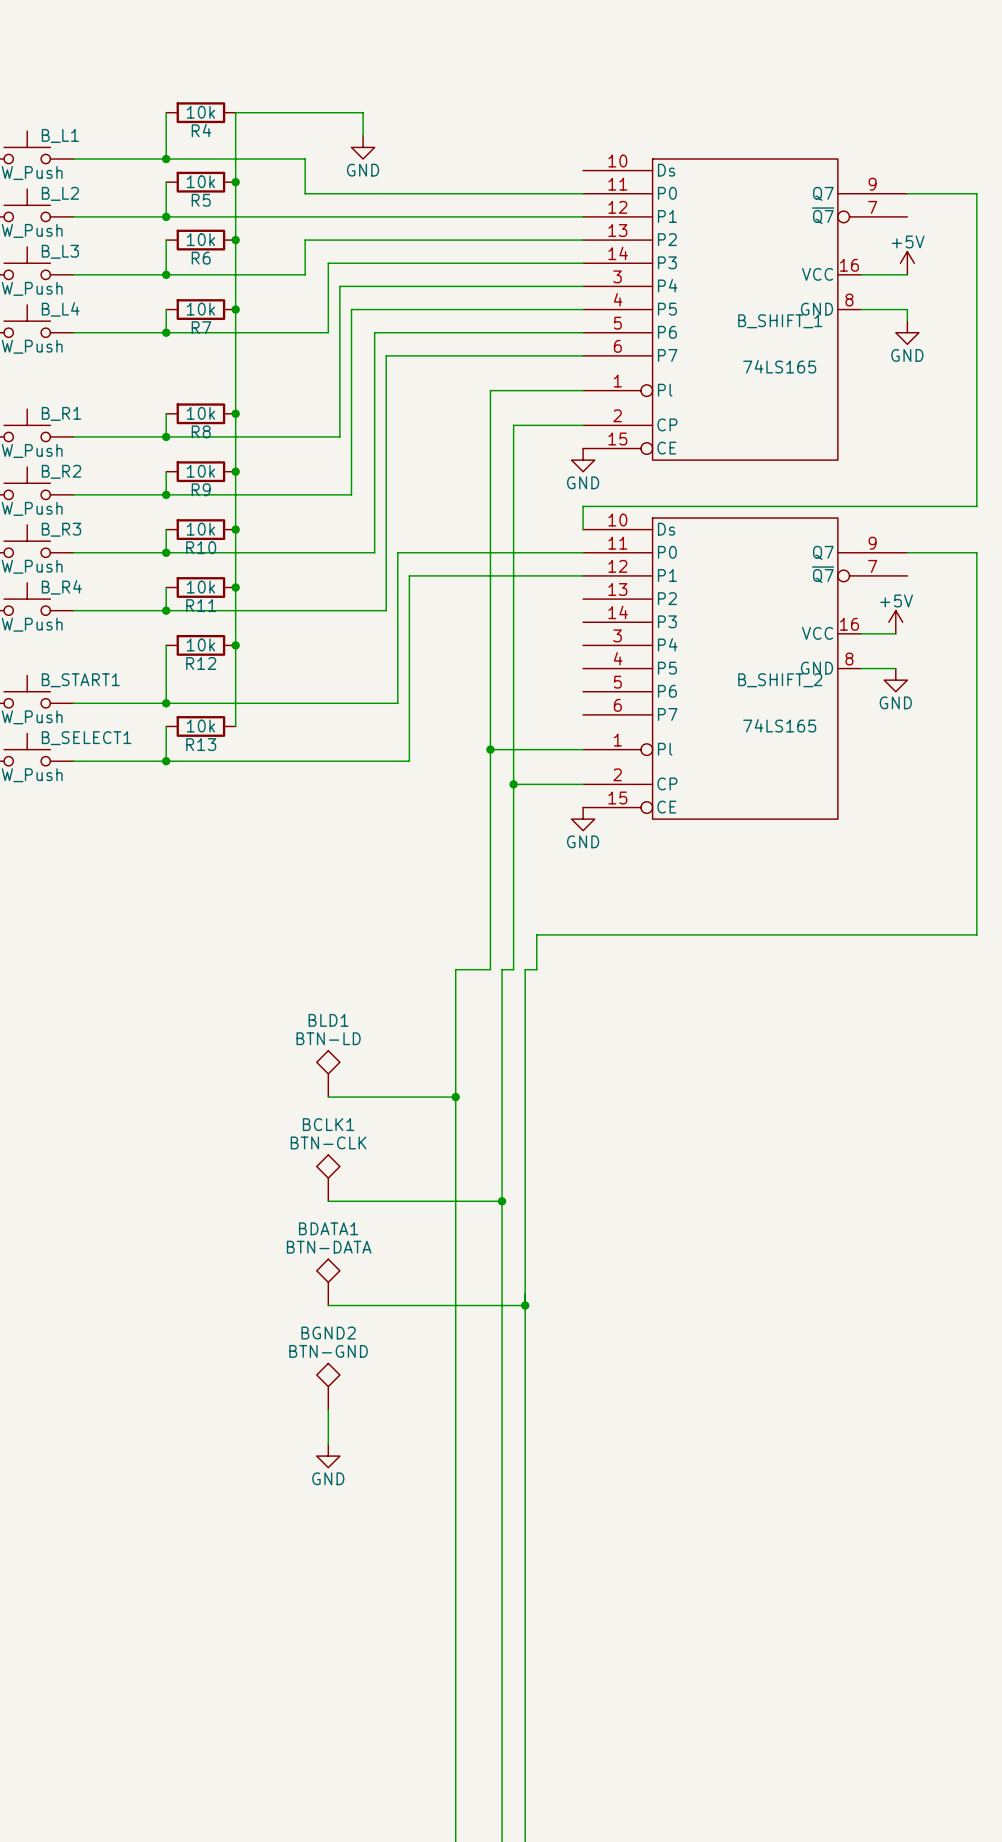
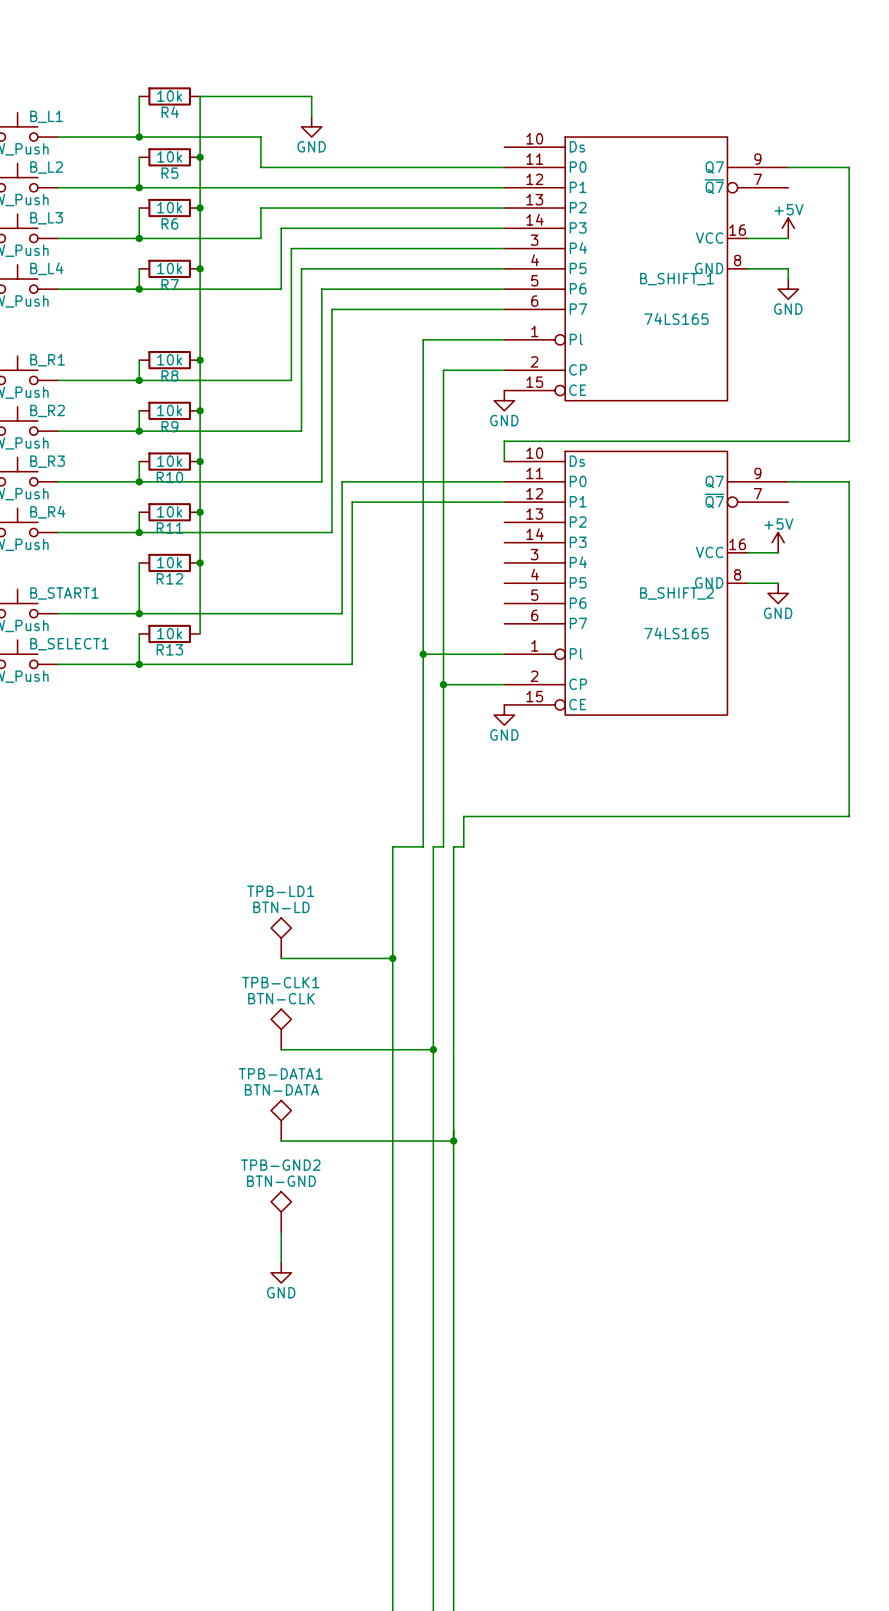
BLD1 name: BLD1 (328, 1020) -> TPB-LD1 (280, 891)
BCLK1 name: BCLK1 (328, 1124) -> TPB-CLK1 (280, 982)
BDATA1 name: BDATA1 (328, 1228) -> TPB-DATA1 (280, 1073)
BGND2 name: BGND2 (328, 1333) -> TPB-GND2 (280, 1165)

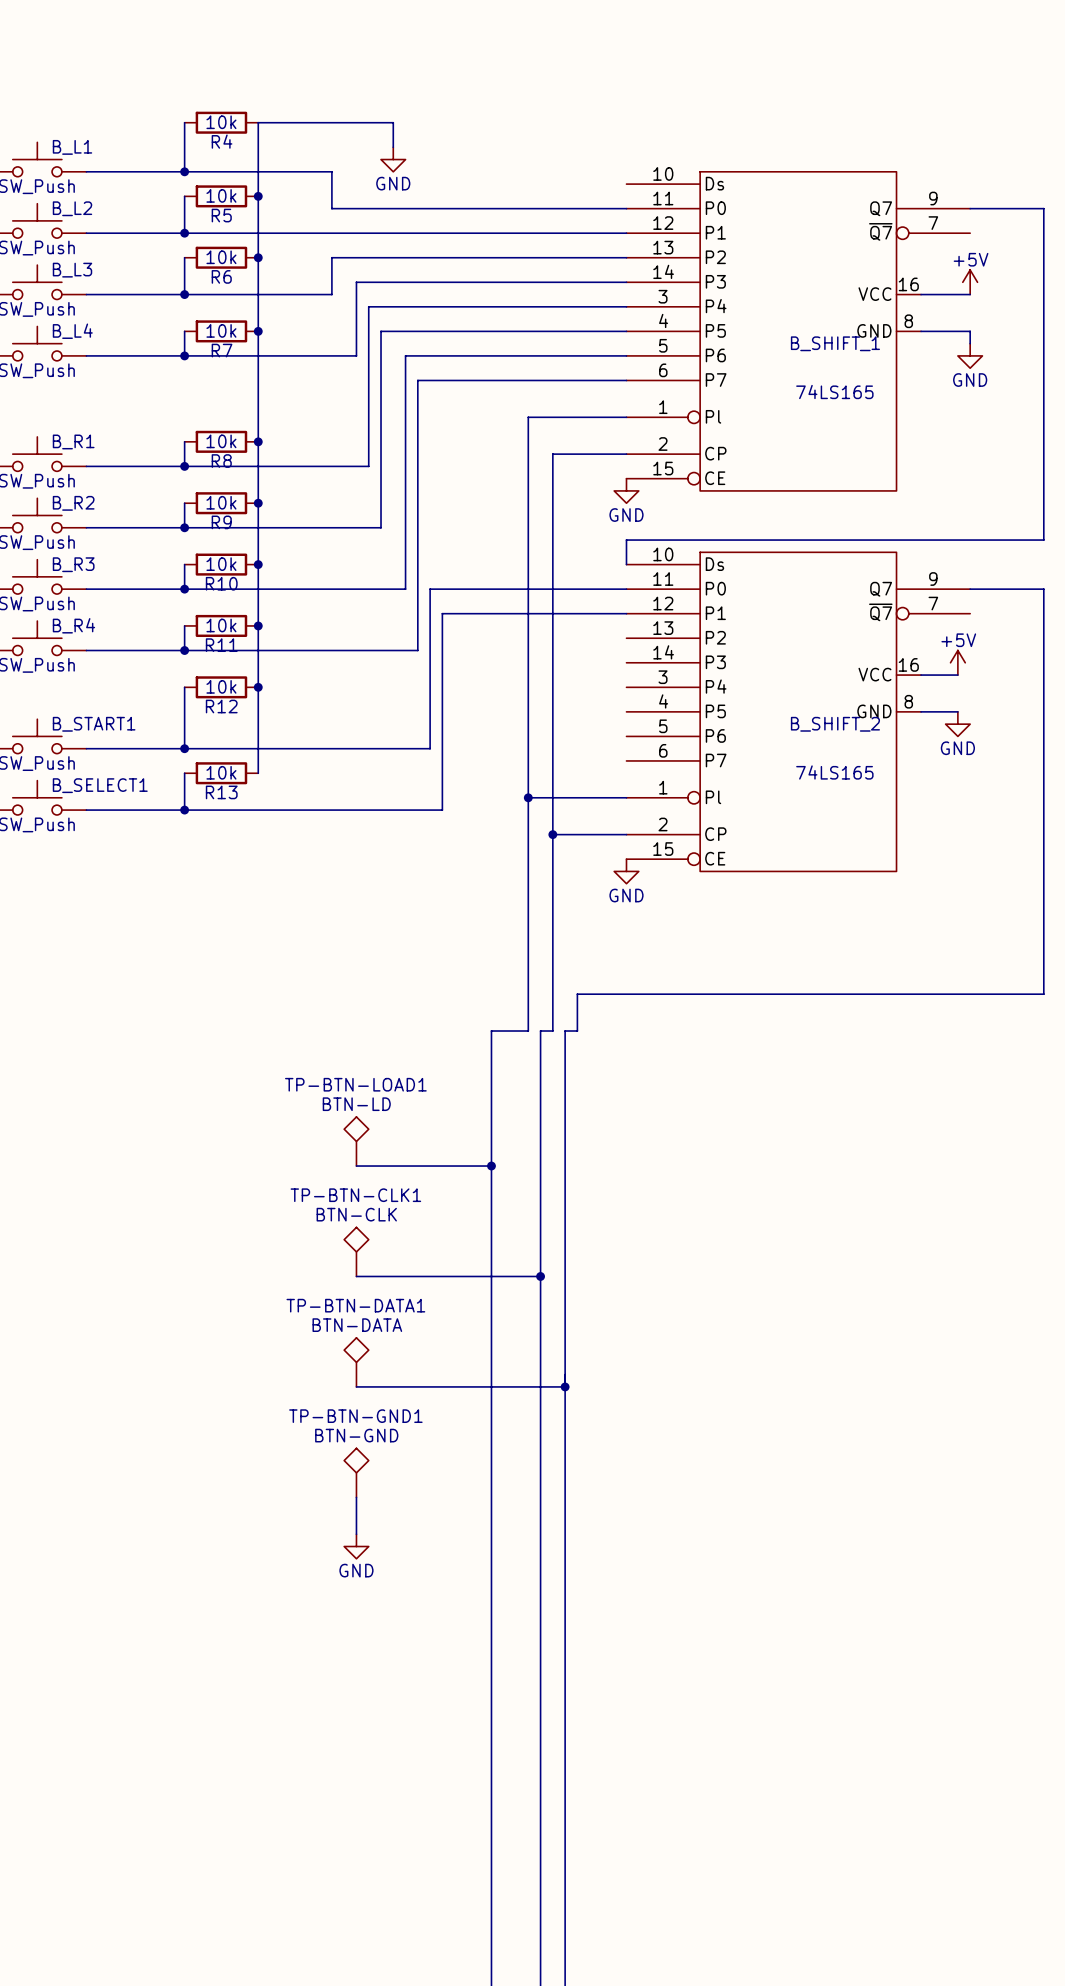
TPB-LD1 name: TPB-LD1 (280, 891) -> TP-BTN-LOAD1 (355, 1084)
TPB-CLK1 name: TPB-CLK1 (280, 982) -> TP-BTN-CLK1 (355, 1195)
TPB-DATA1 name: TPB-DATA1 (280, 1073) -> TP-BTN-DATA1 (355, 1305)
TPB-GND2 name: TPB-GND2 (280, 1165) -> TP-BTN-GND1 (355, 1416)

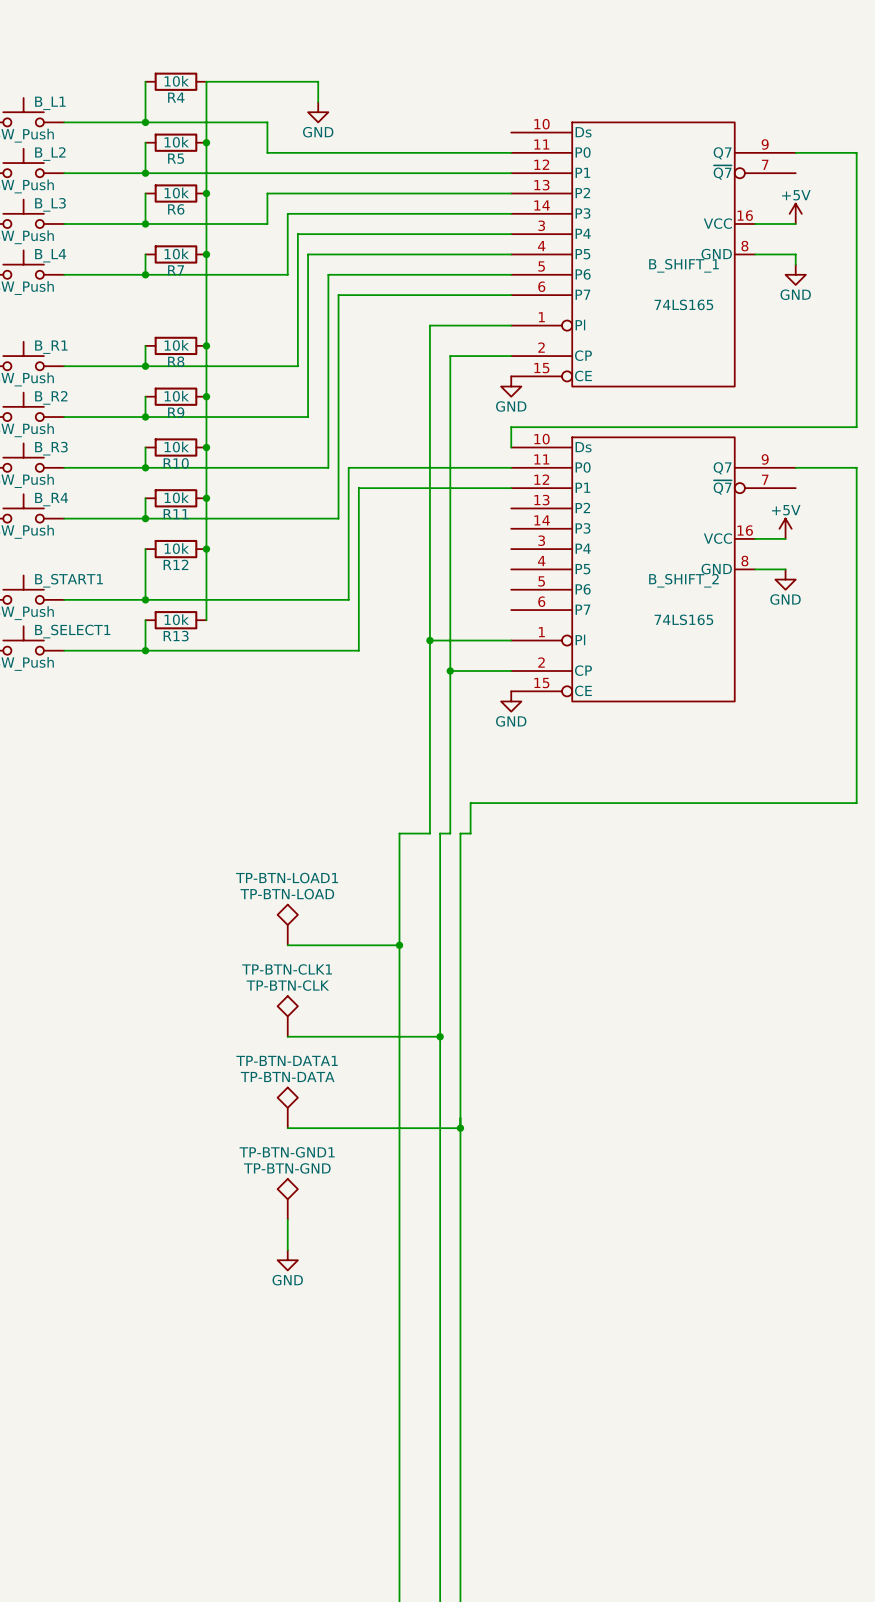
TP-BTN-LOAD1 value: BTN-LD (356, 1104) -> TP-BTN-LOAD (287, 894)
TP-BTN-CLK1 value: BTN-CLK (356, 1214) -> TP-BTN-CLK (287, 985)
TP-BTN-DATA1 value: BTN-DATA (357, 1325) -> TP-BTN-DATA (287, 1077)
TP-BTN-GND1 value: BTN-GND (356, 1435) -> TP-BTN-GND (287, 1168)

